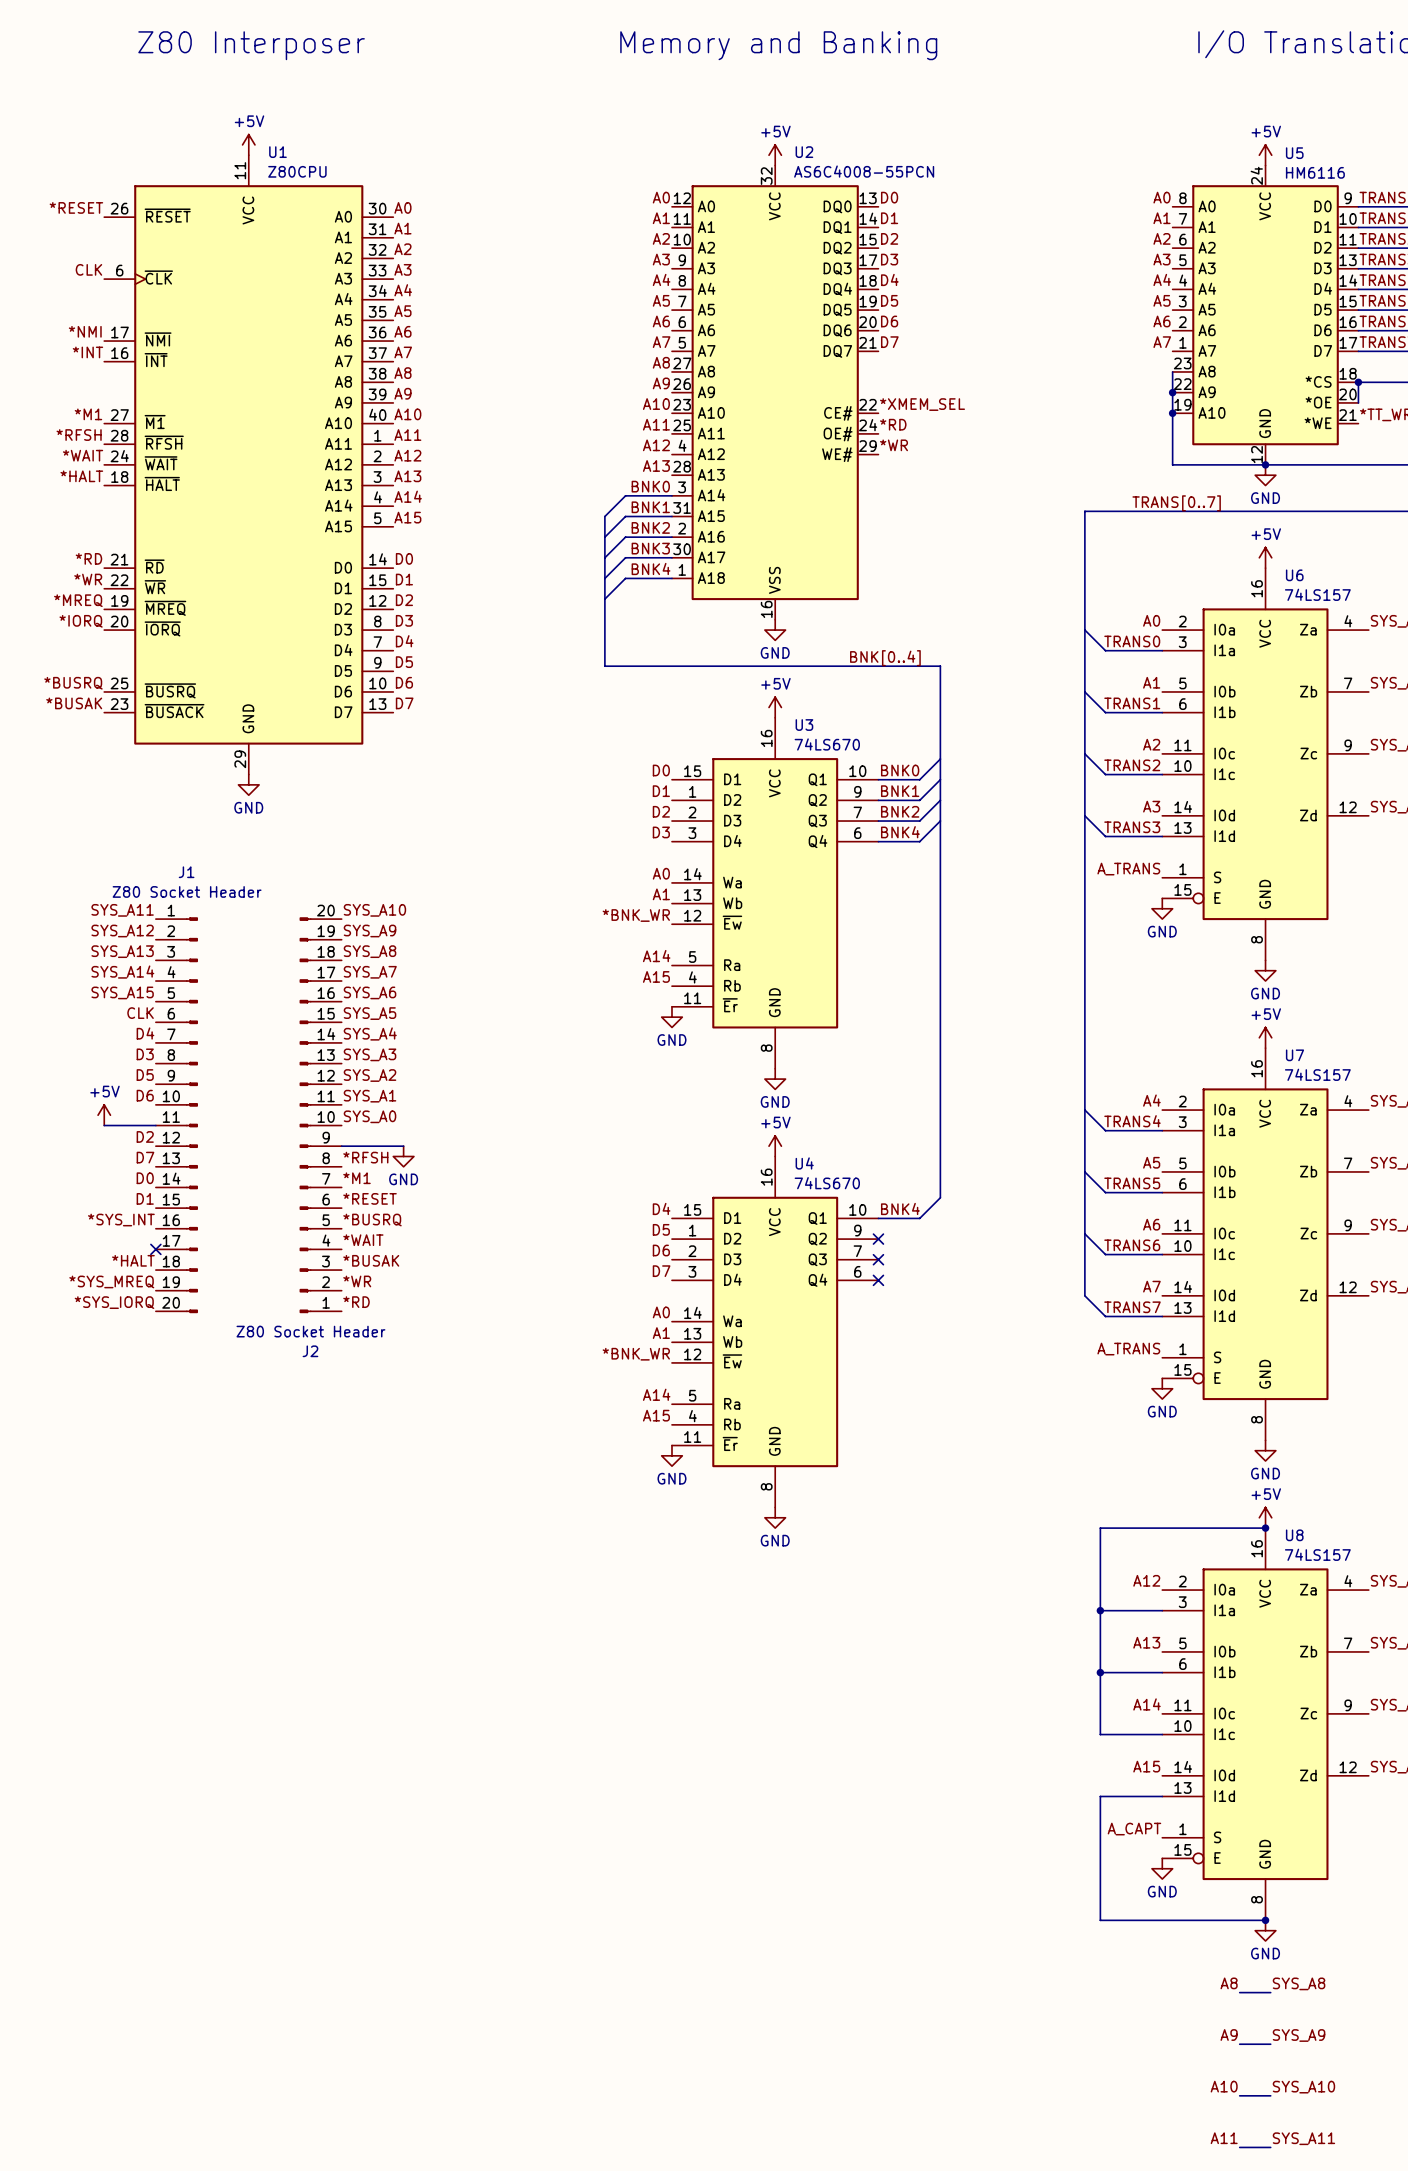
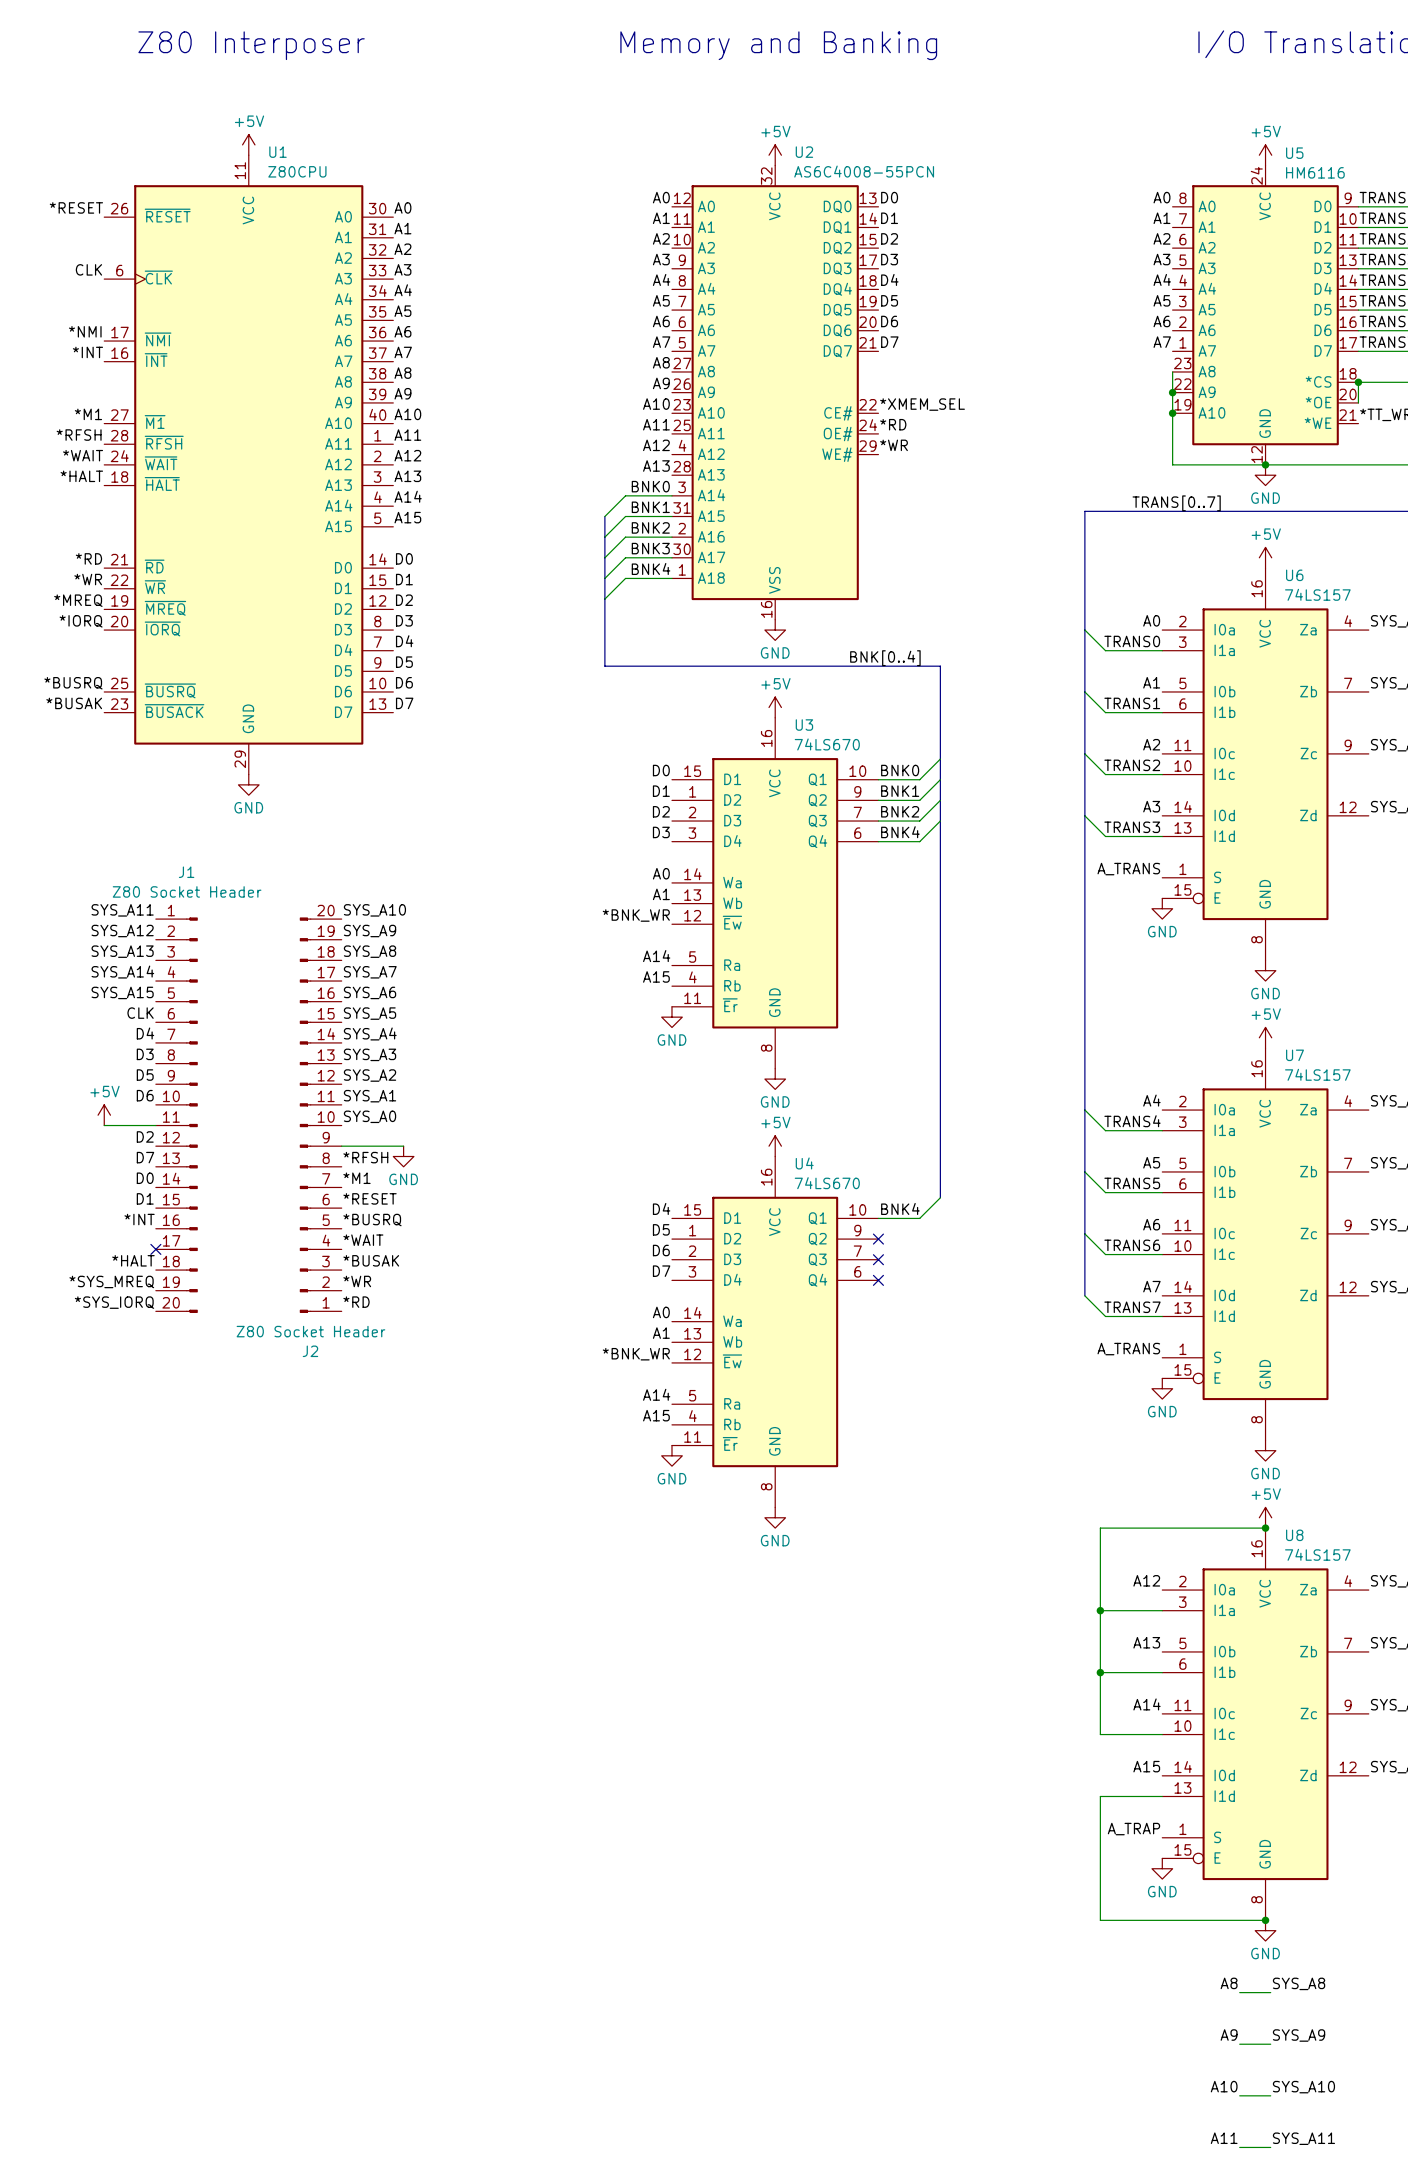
label: *SYS_INT (121, 1220) -> *INT (139, 1219)
label: A_CAPT (1134, 1829) -> A_TRAP (1133, 1829)

